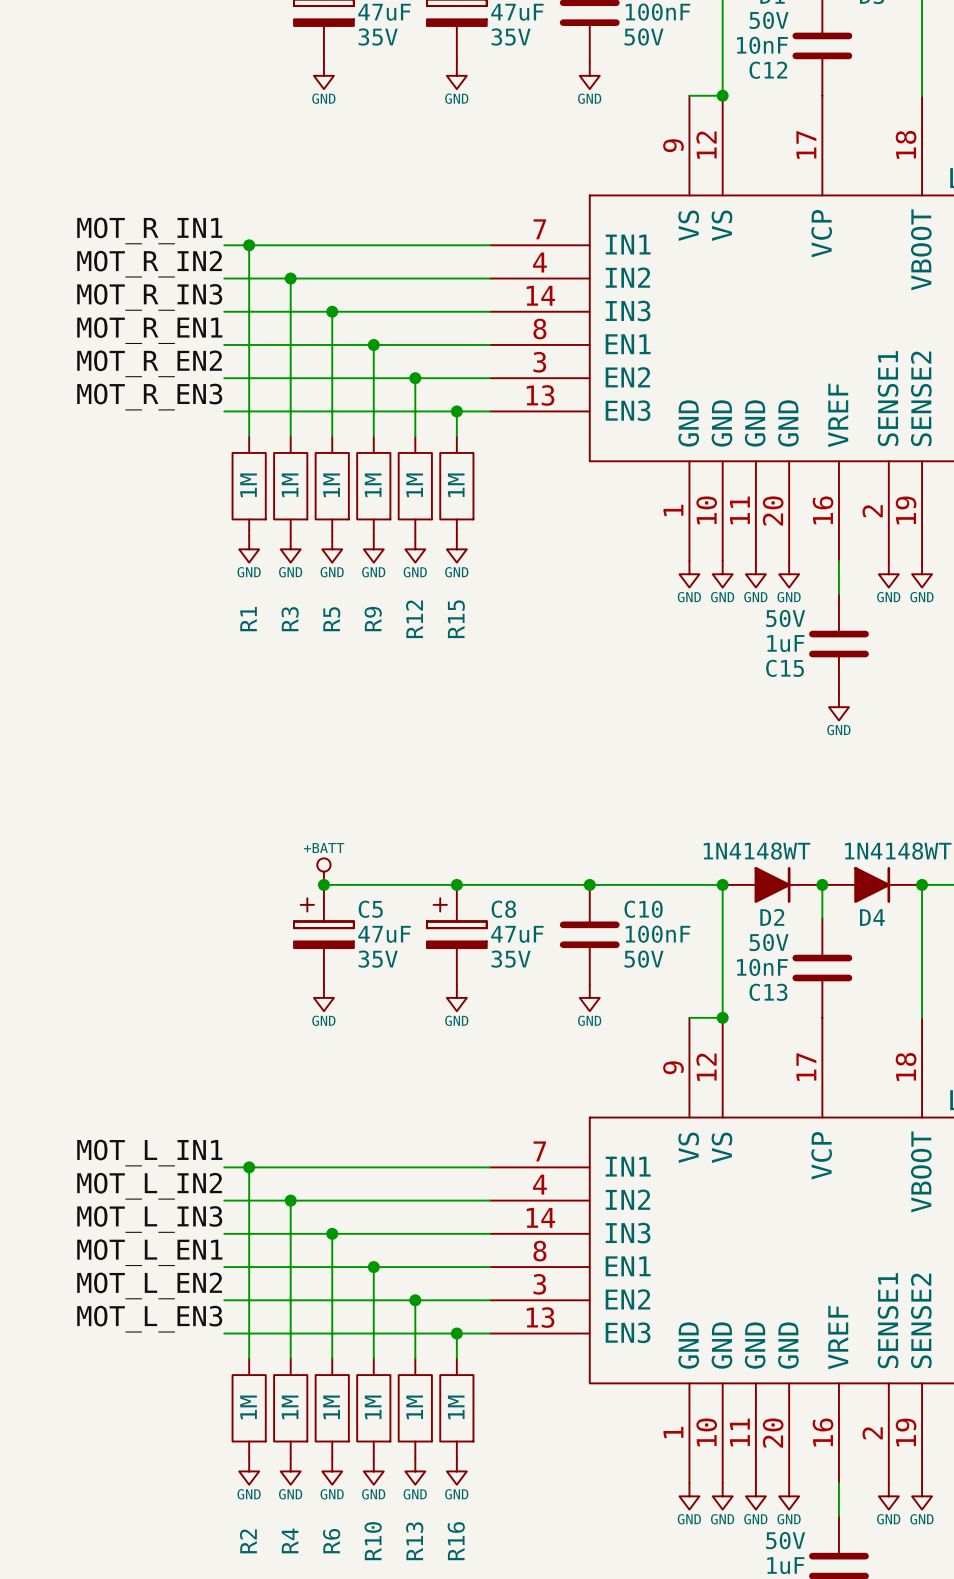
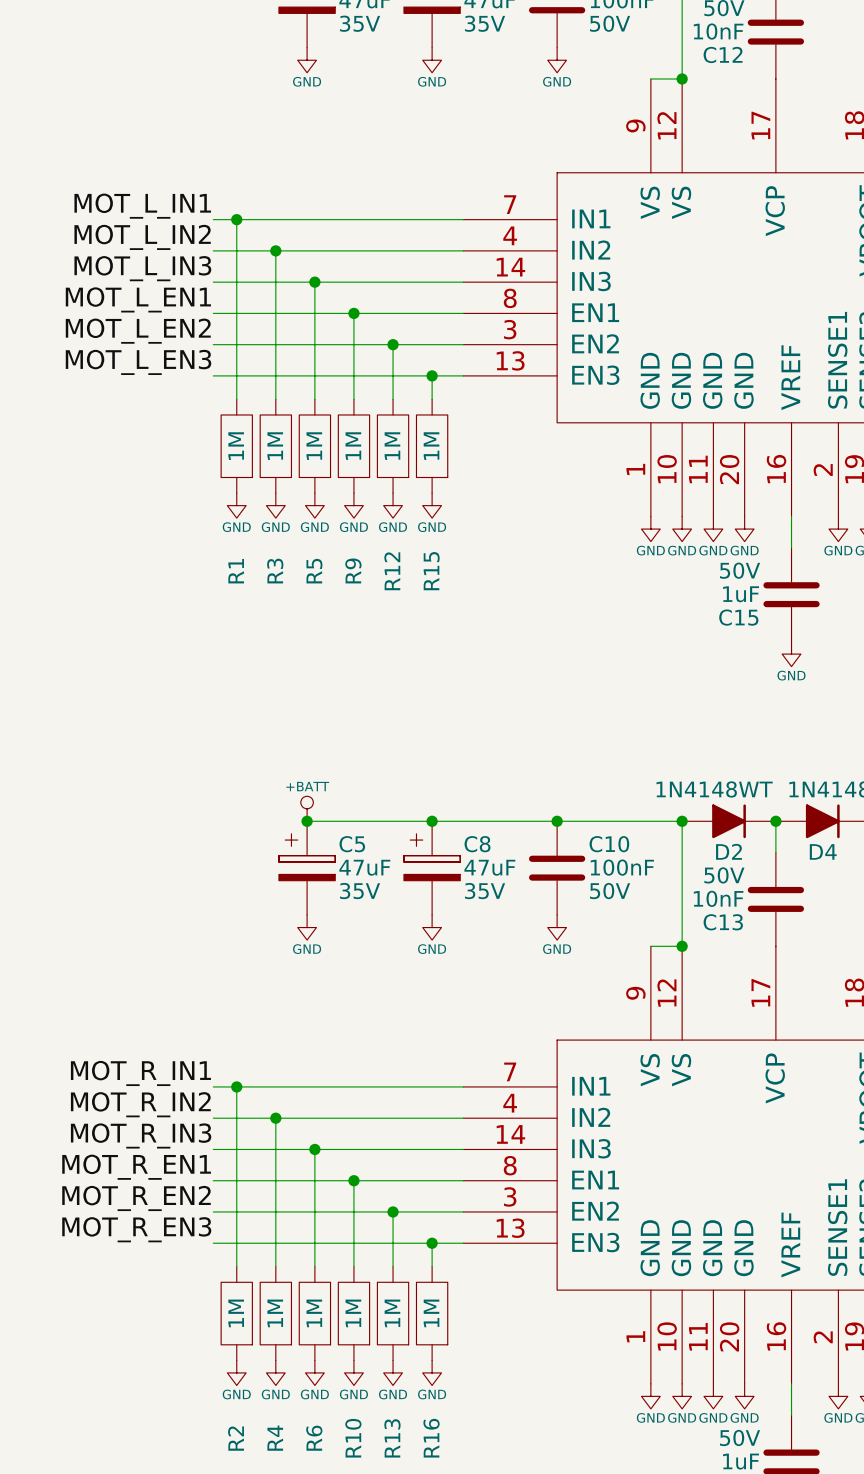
label: MOT_R_IN1 (149, 230) -> MOT_L_IN1 (142, 206)
label: MOT_R_IN2 (149, 264) -> MOT_L_IN2 (142, 237)
label: MOT_R_IN3 (149, 297) -> MOT_L_IN3 (142, 268)
label: MOT_R_EN1 (149, 330) -> MOT_L_EN1 (138, 299)
label: MOT_R_EN2 (149, 363) -> MOT_L_EN2 (138, 331)
label: MOT_R_EN3 (149, 397) -> MOT_L_EN3 (138, 362)
label: MOT_L_IN1 (149, 1153) -> MOT_R_IN1 (140, 1073)
label: MOT_L_IN2 (149, 1186) -> MOT_R_IN2 (140, 1104)
label: MOT_L_IN3 (149, 1219) -> MOT_R_IN3 (141, 1135)
label: MOT_L_EN1 (149, 1252) -> MOT_R_EN1 (136, 1167)
label: MOT_L_EN2 (149, 1285) -> MOT_R_EN2 (136, 1198)
label: MOT_L_EN3 (149, 1319) -> MOT_R_EN3 (136, 1229)

